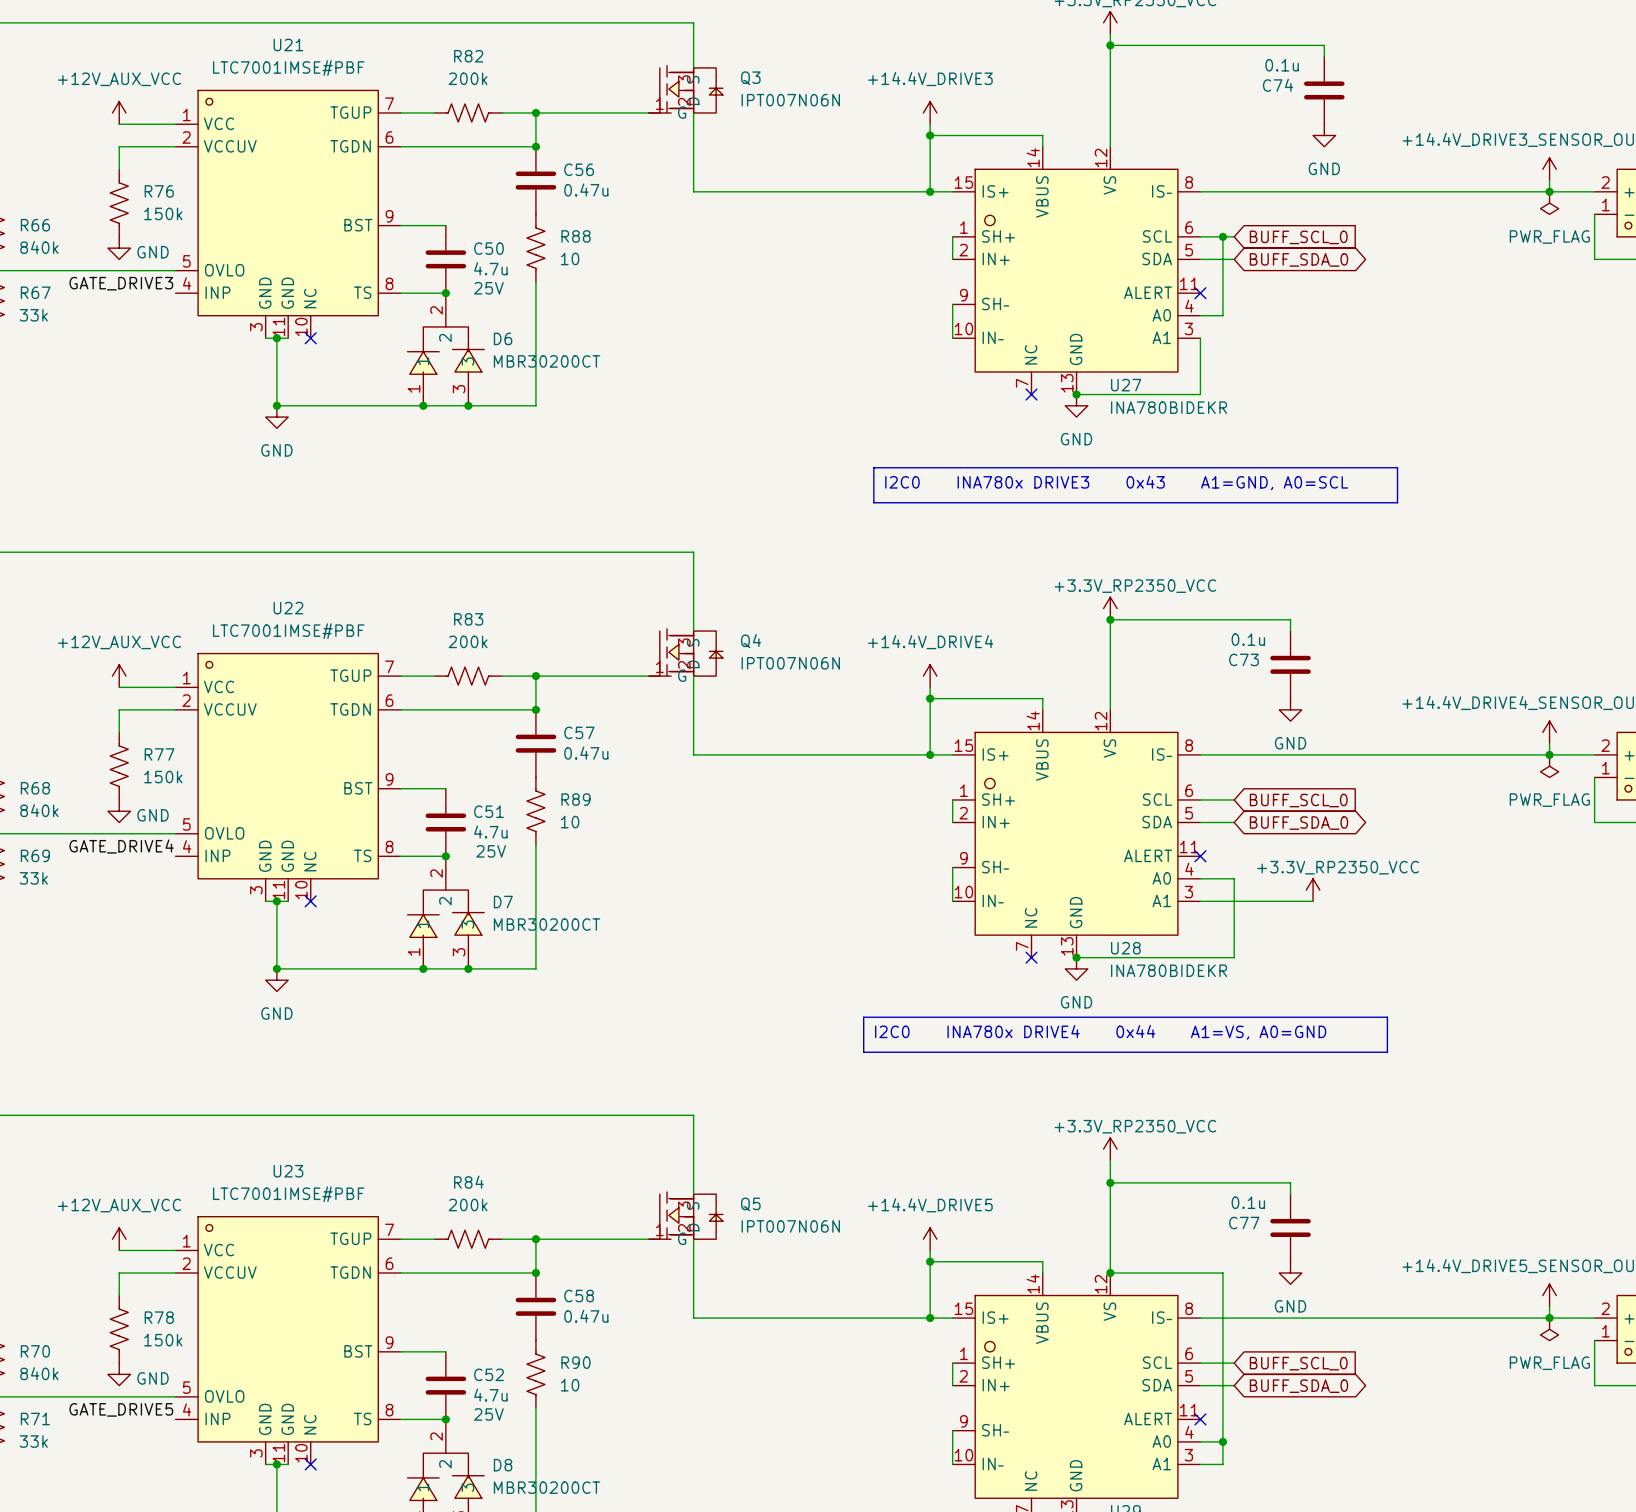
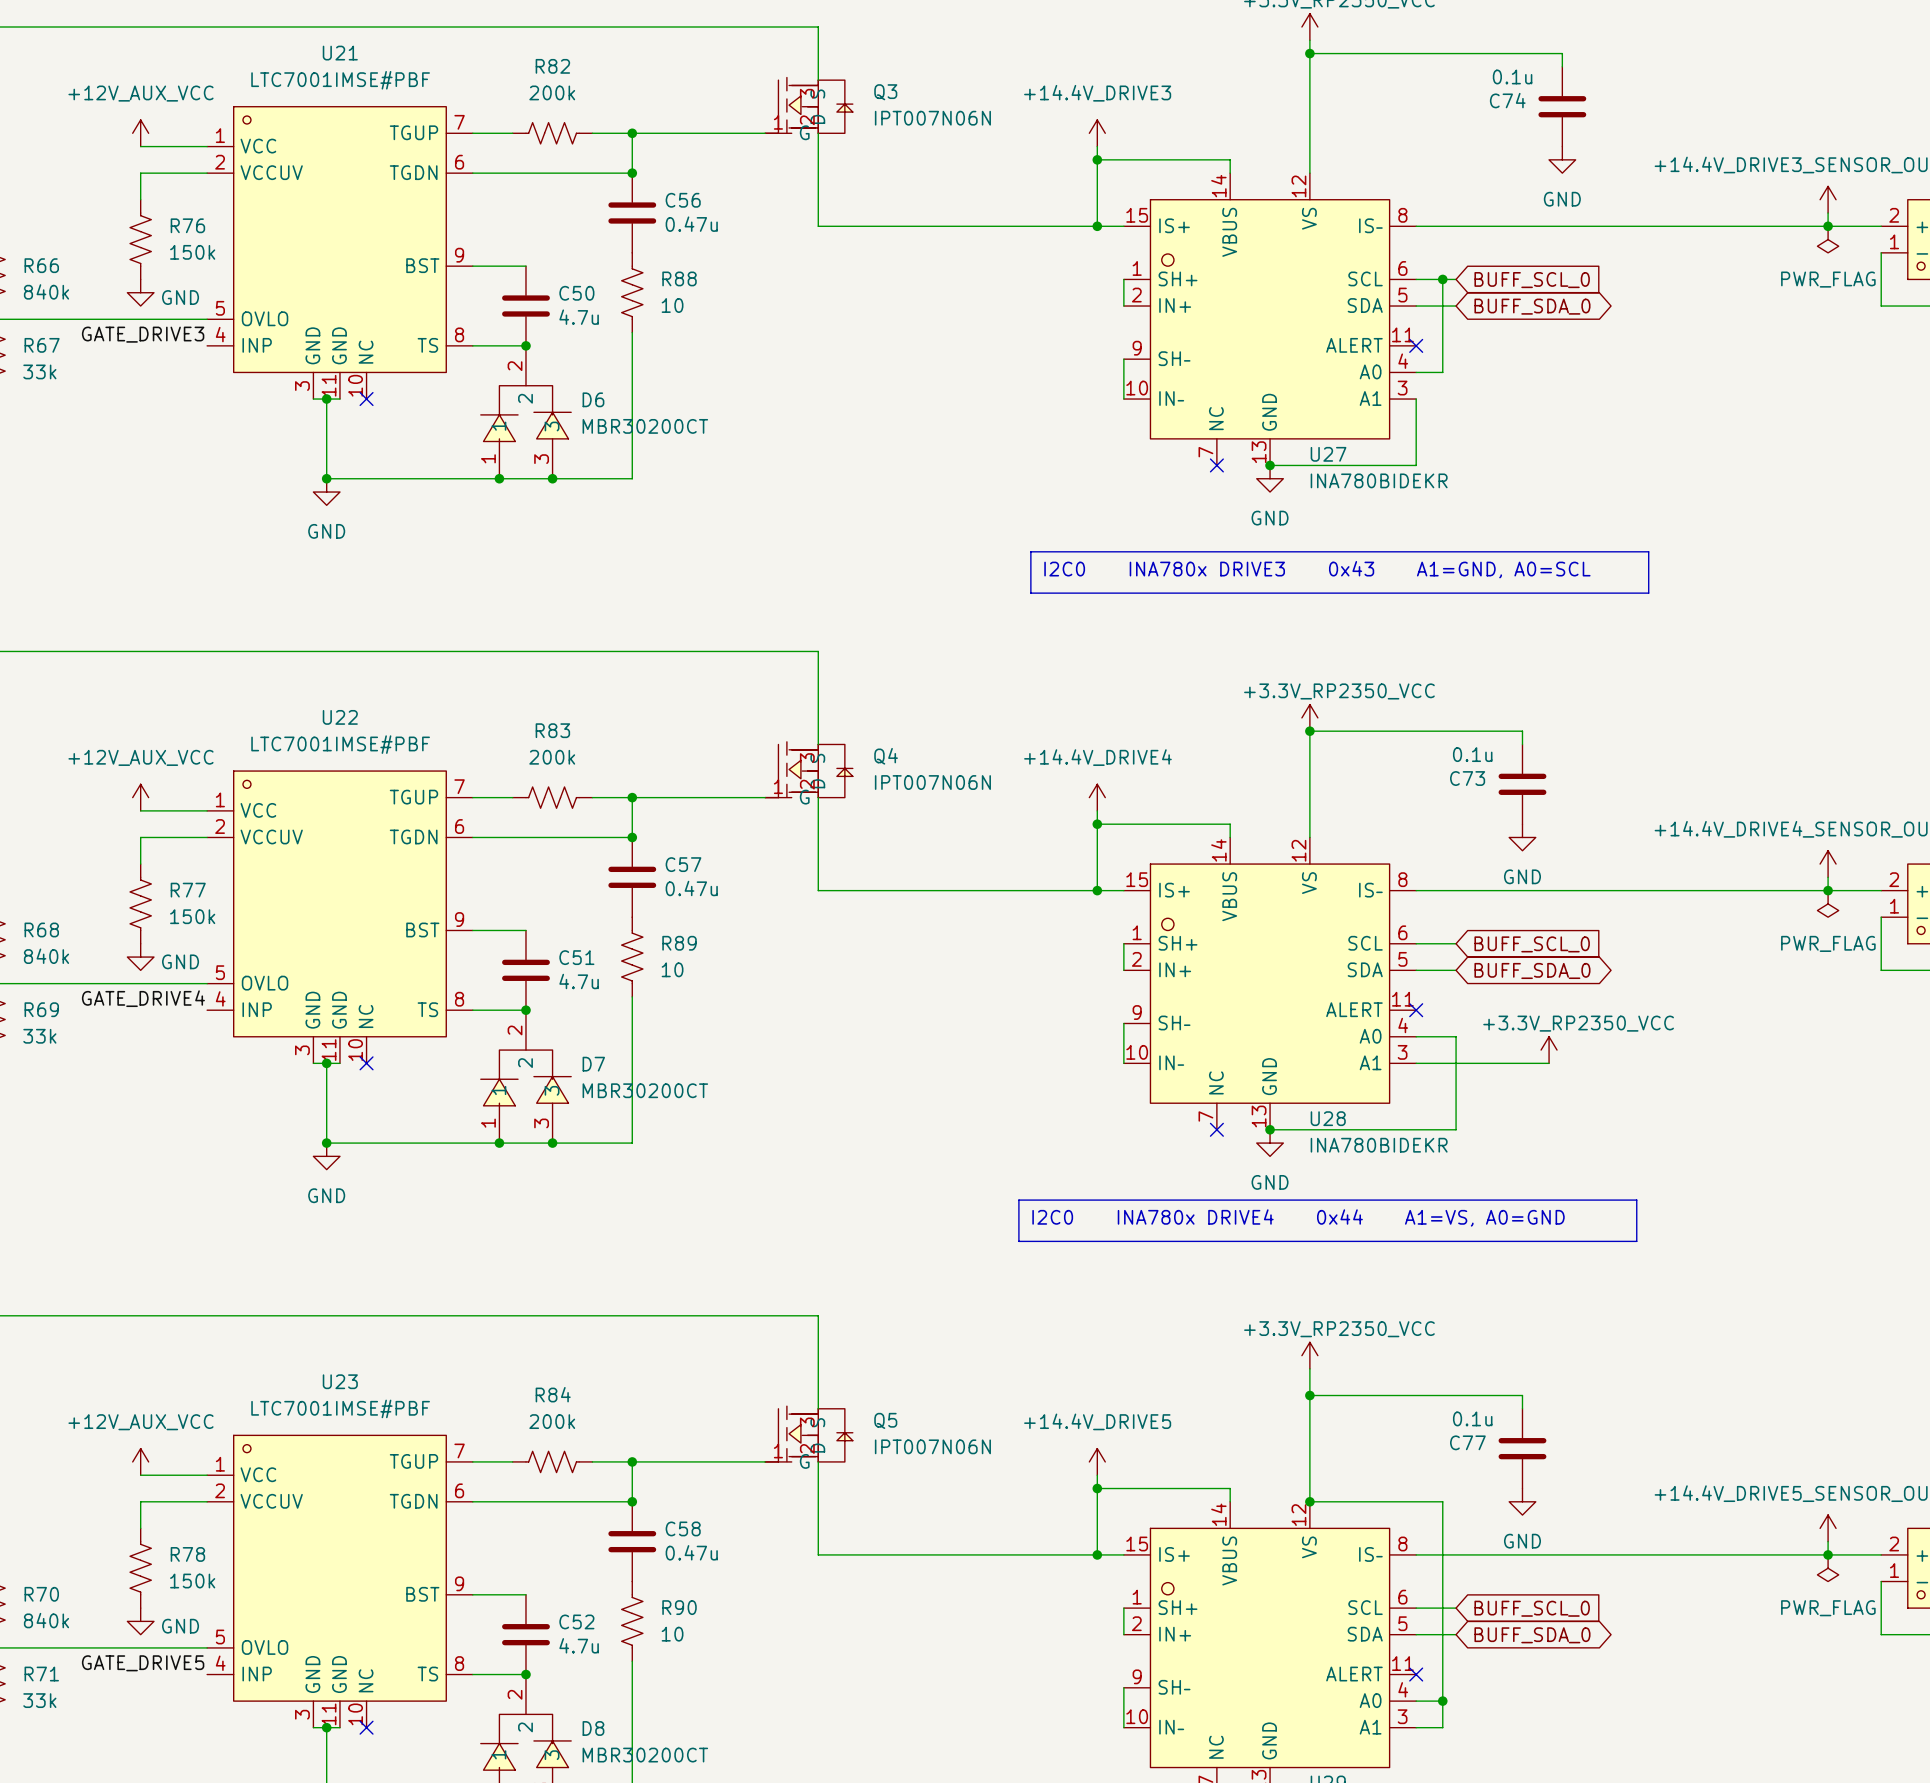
C50 text: 25V (488, 288) -> none
C51 text: 25V (491, 851) -> none
C52 text: 25V (488, 1414) -> none

